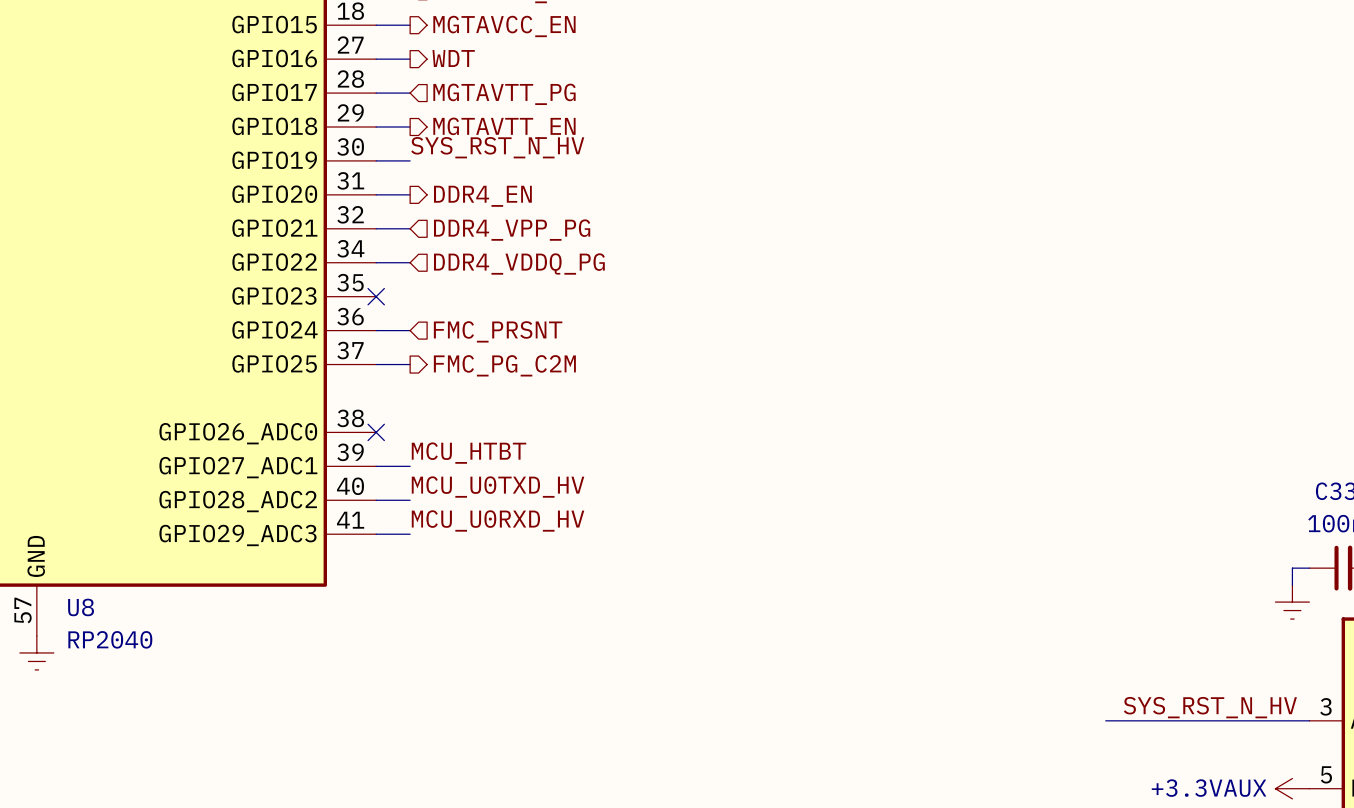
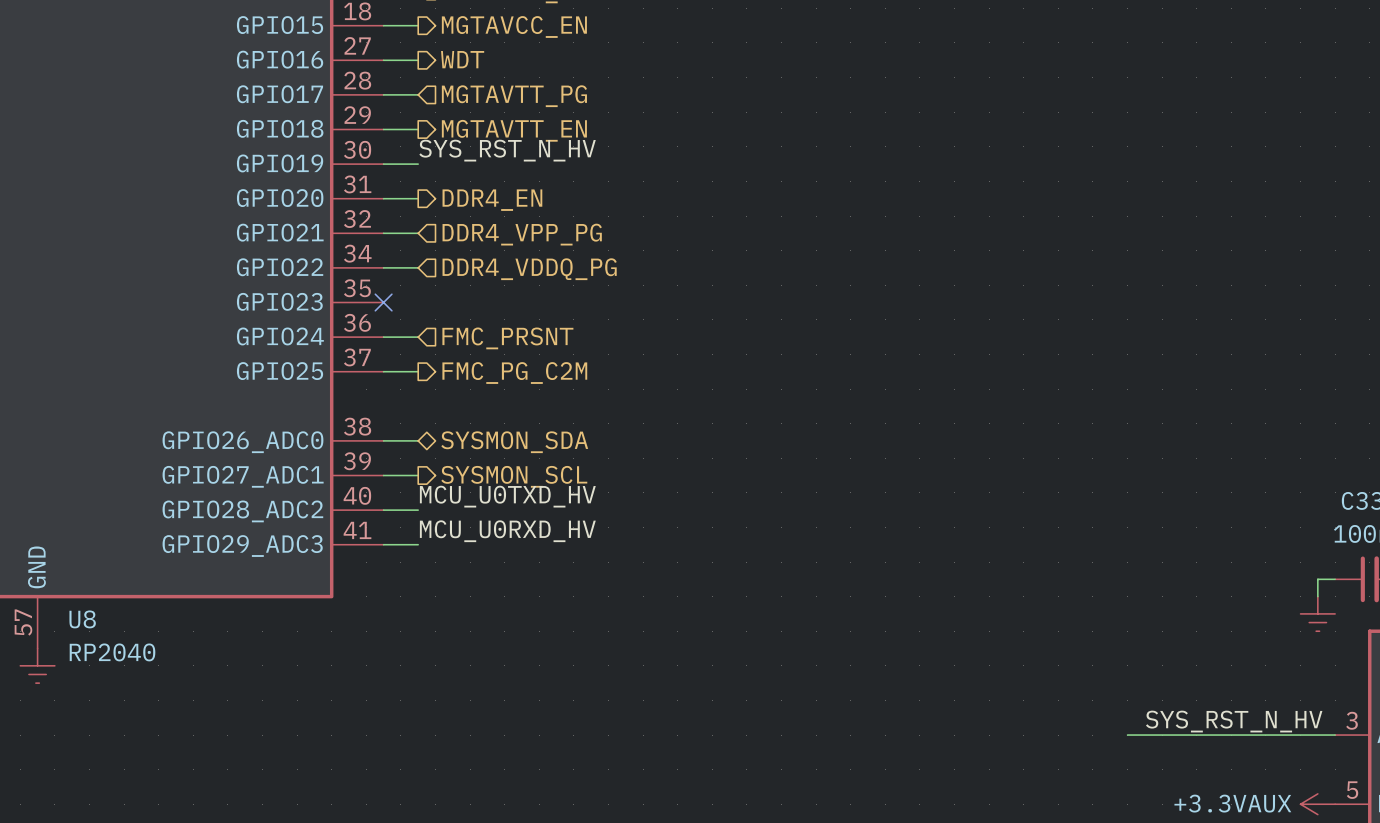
wire: none -> (383, 440) (418, 440)
no-connect mark: (376, 432) -> none
hierarchical label: none -> SYSMON_SDA (514, 442)
label: MCU_HTBT (468, 453) -> none
hierarchical label: none -> SYSMON_SCL (514, 476)

